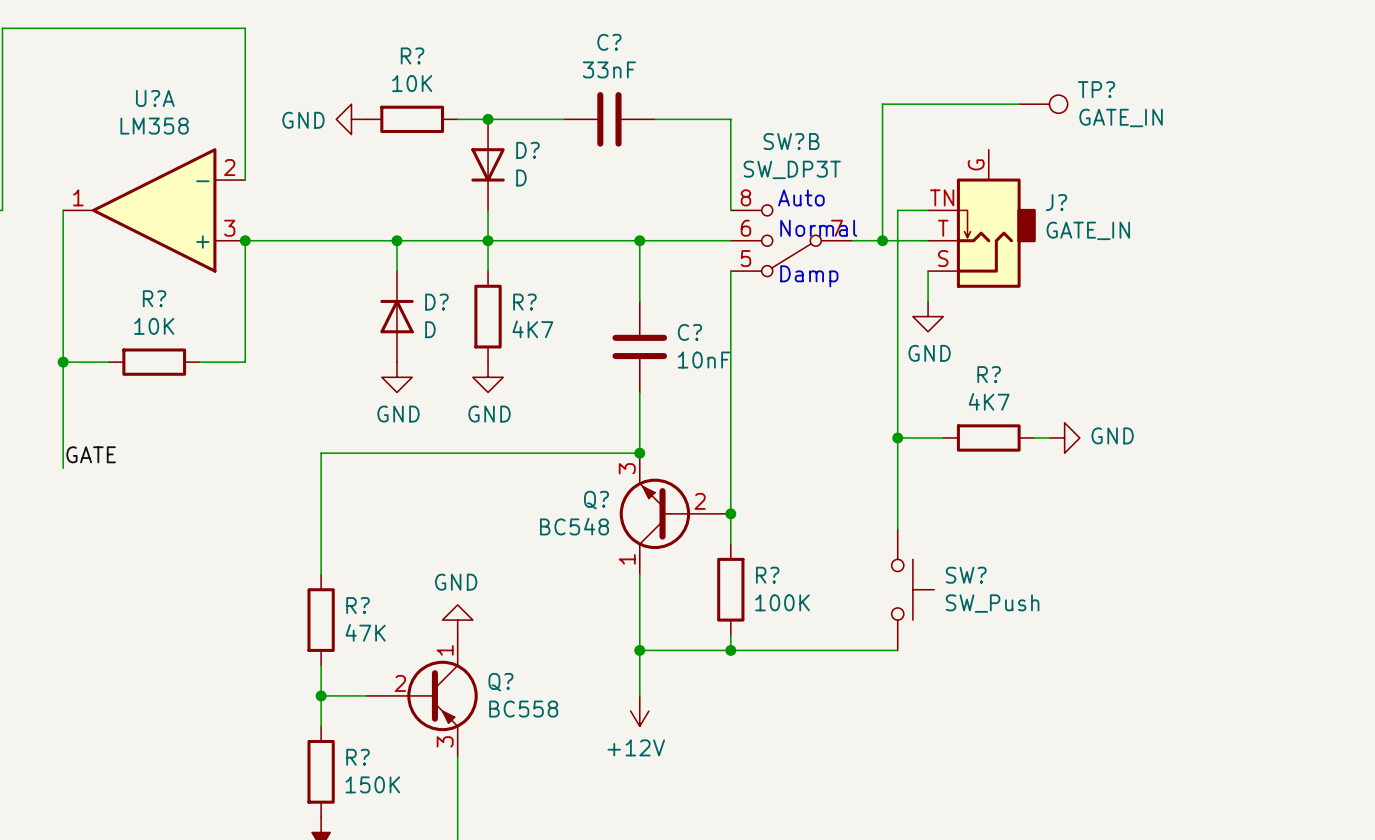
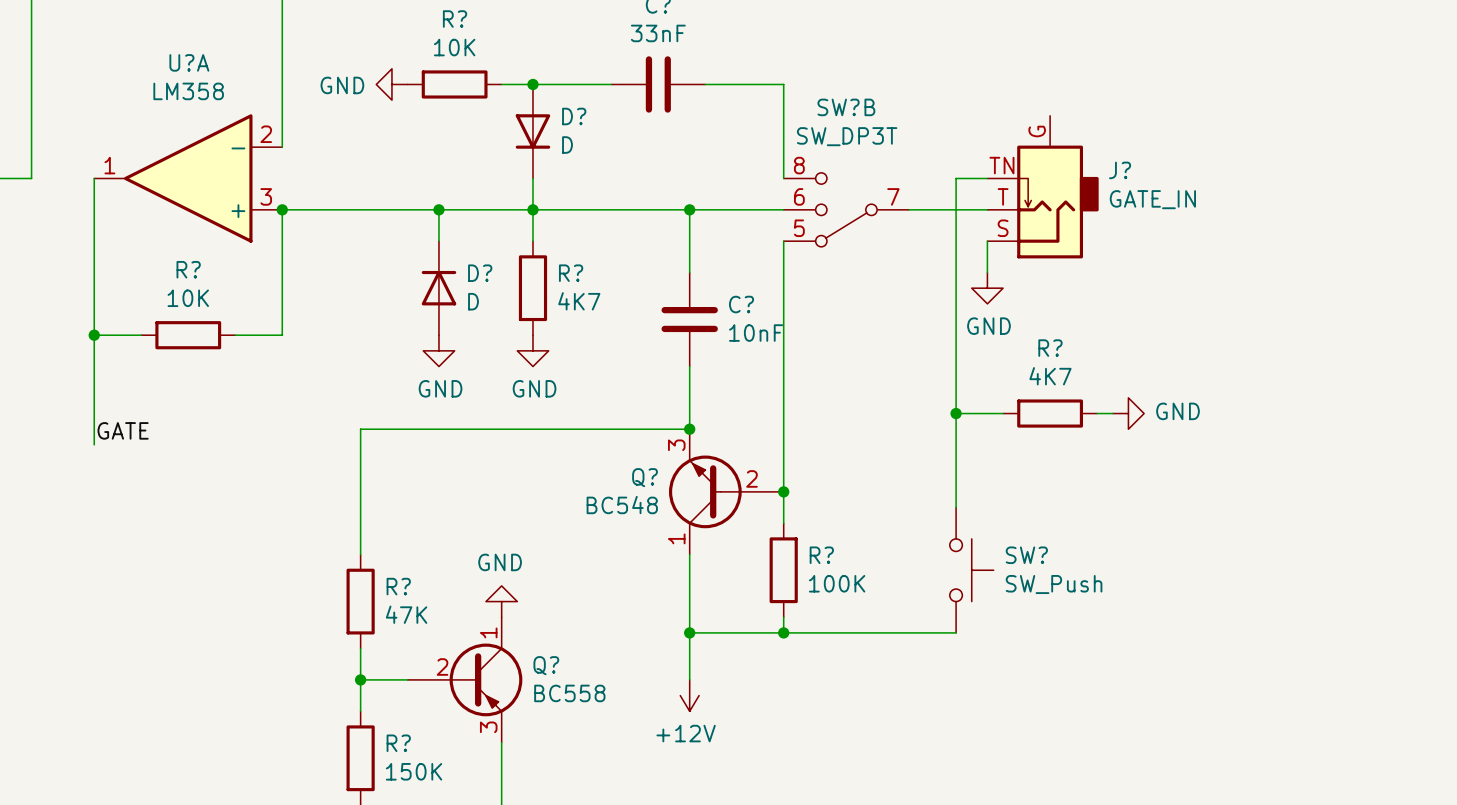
wire: (1019, 104) (882, 104) (882, 240) -> none
TP?: GATE_IN (1043, 104) -> none
text: Auto (801, 197) -> none
text: Normal (818, 228) -> none
junction: (882, 240) -> none
text: Damp (809, 276) -> none

